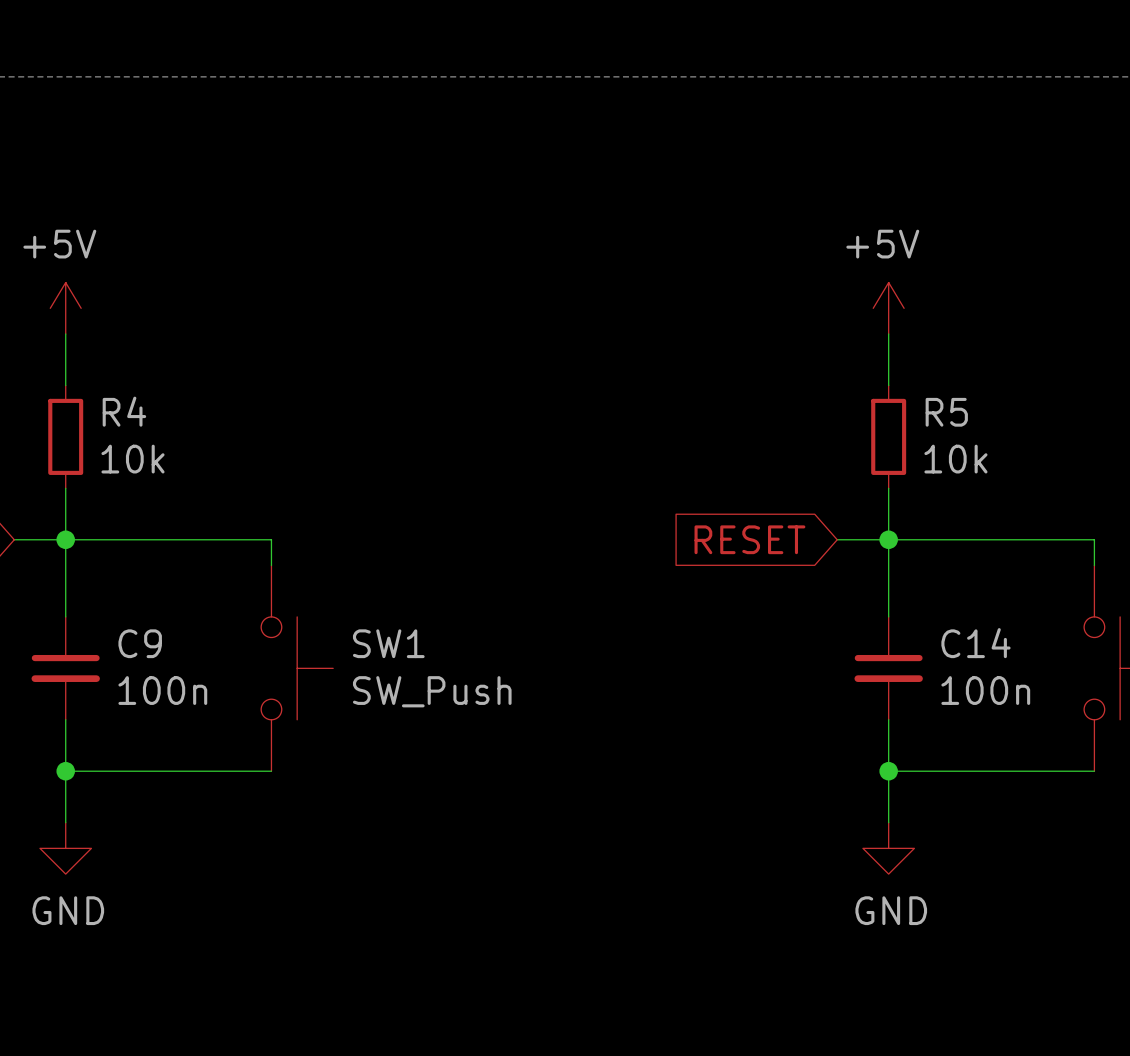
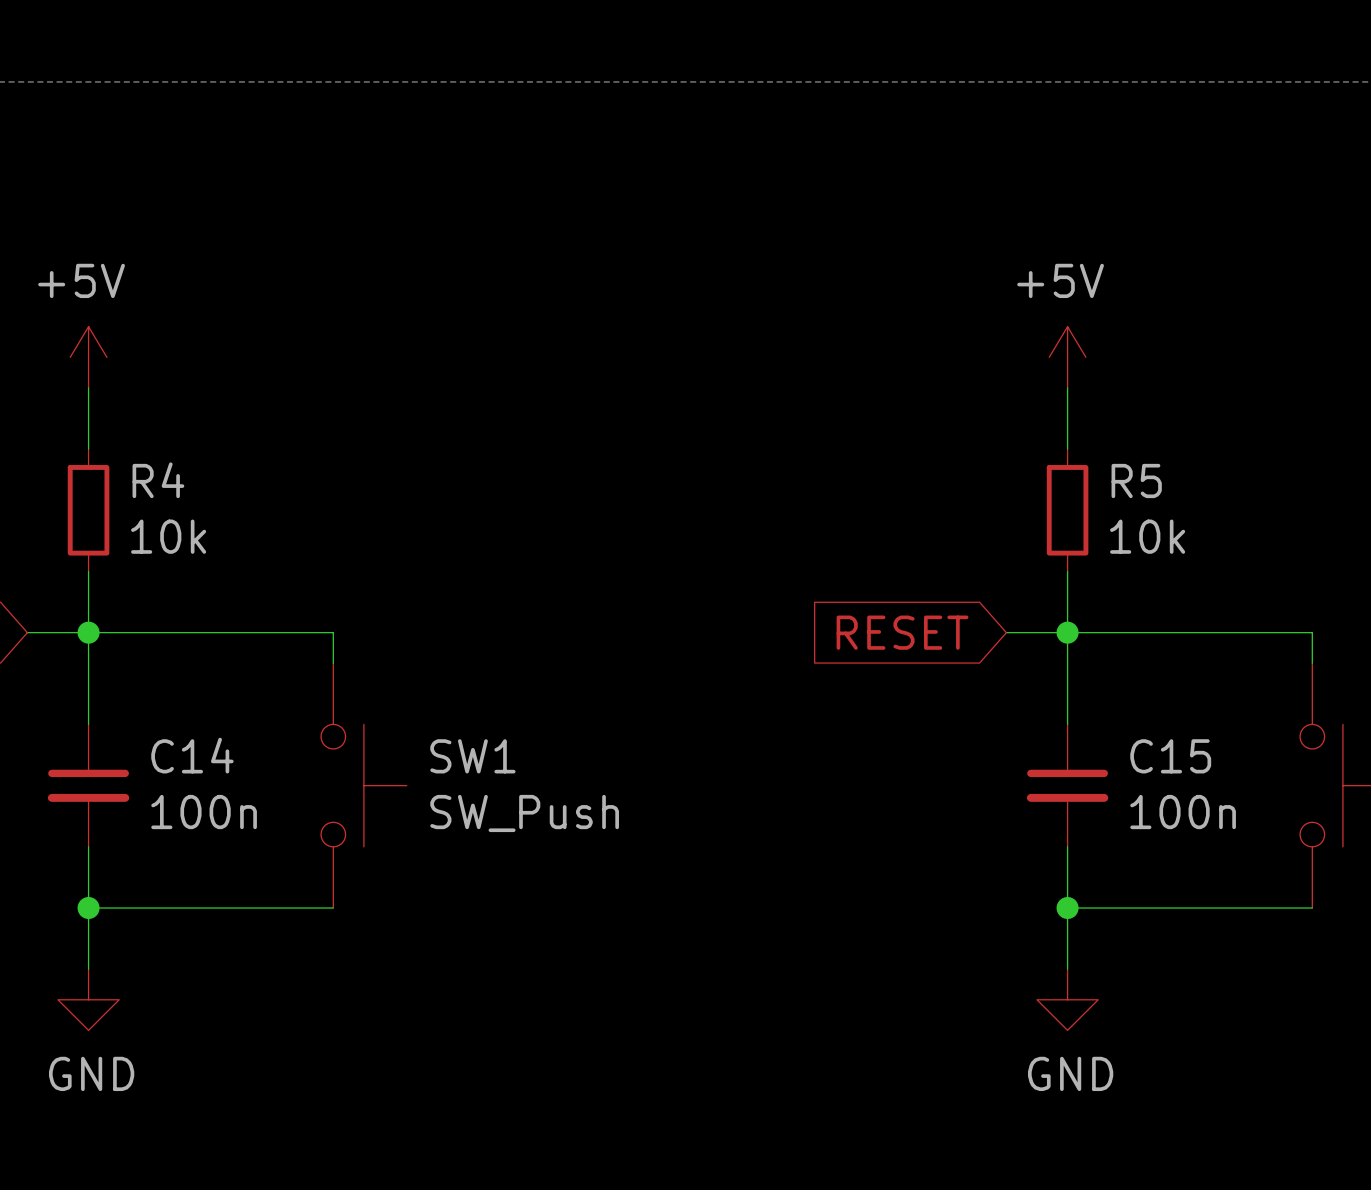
C9 name: C9 (140, 643) -> C14 (192, 755)
C14 name: C14 (975, 643) -> C15 (1170, 756)

